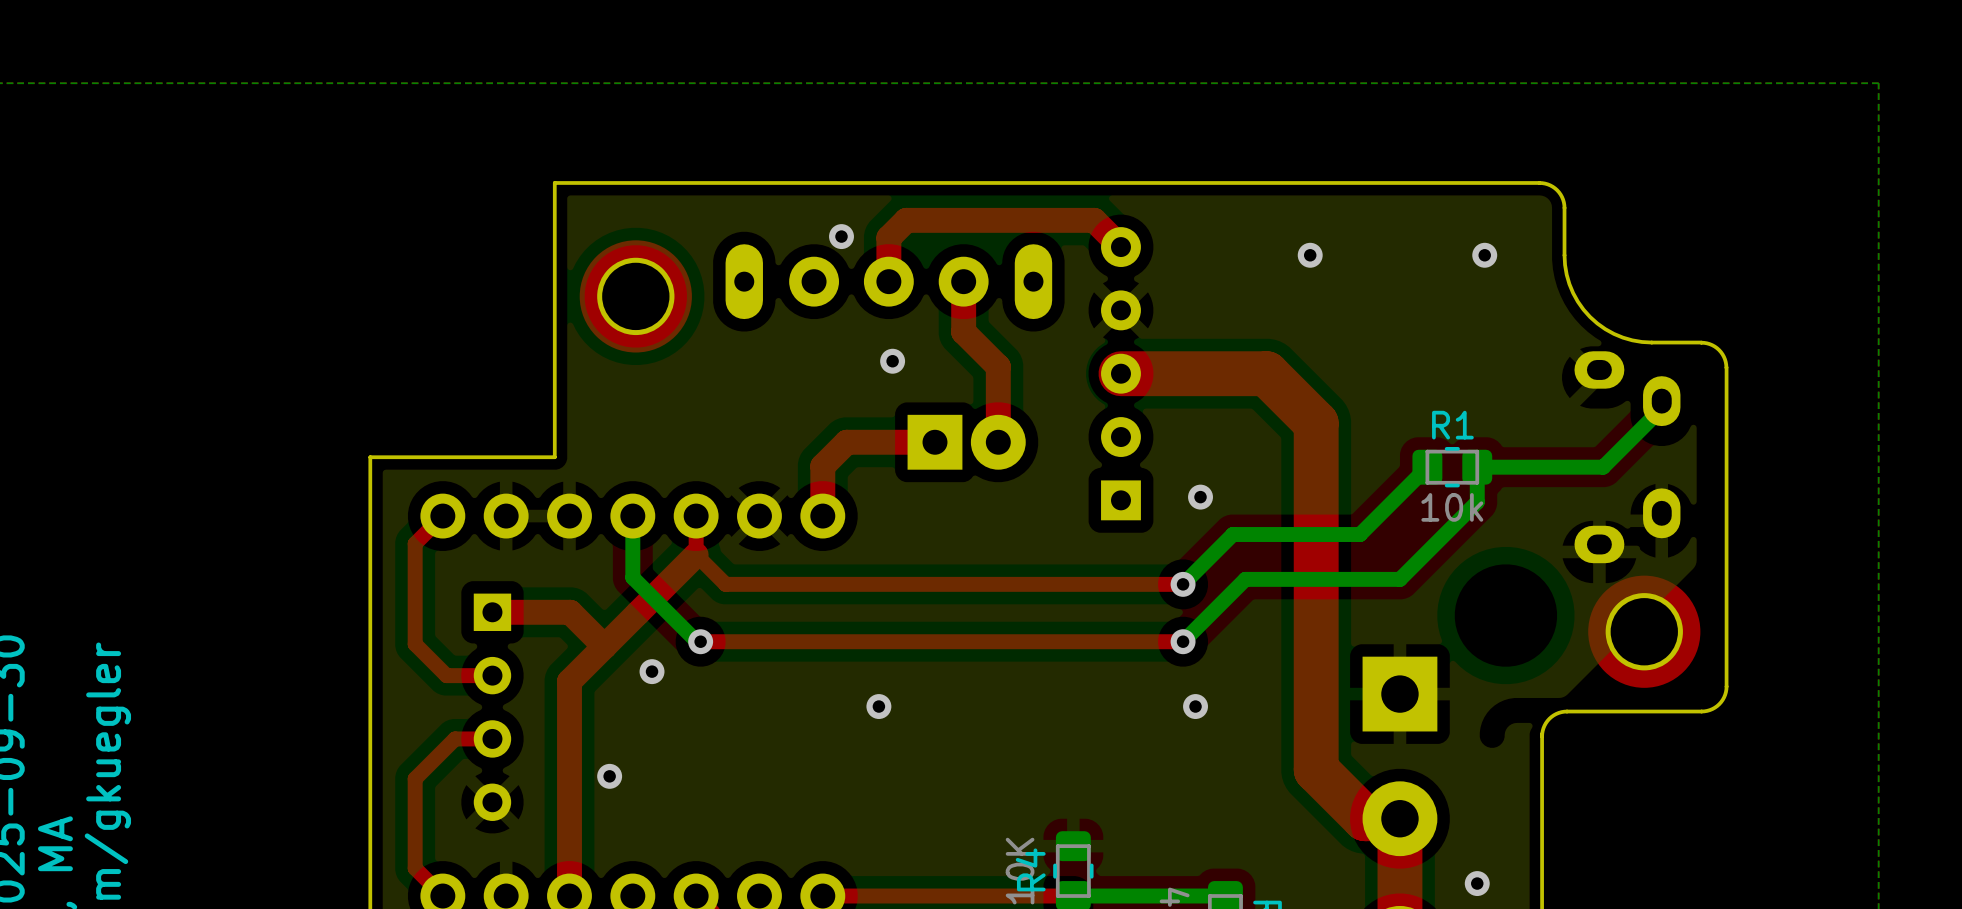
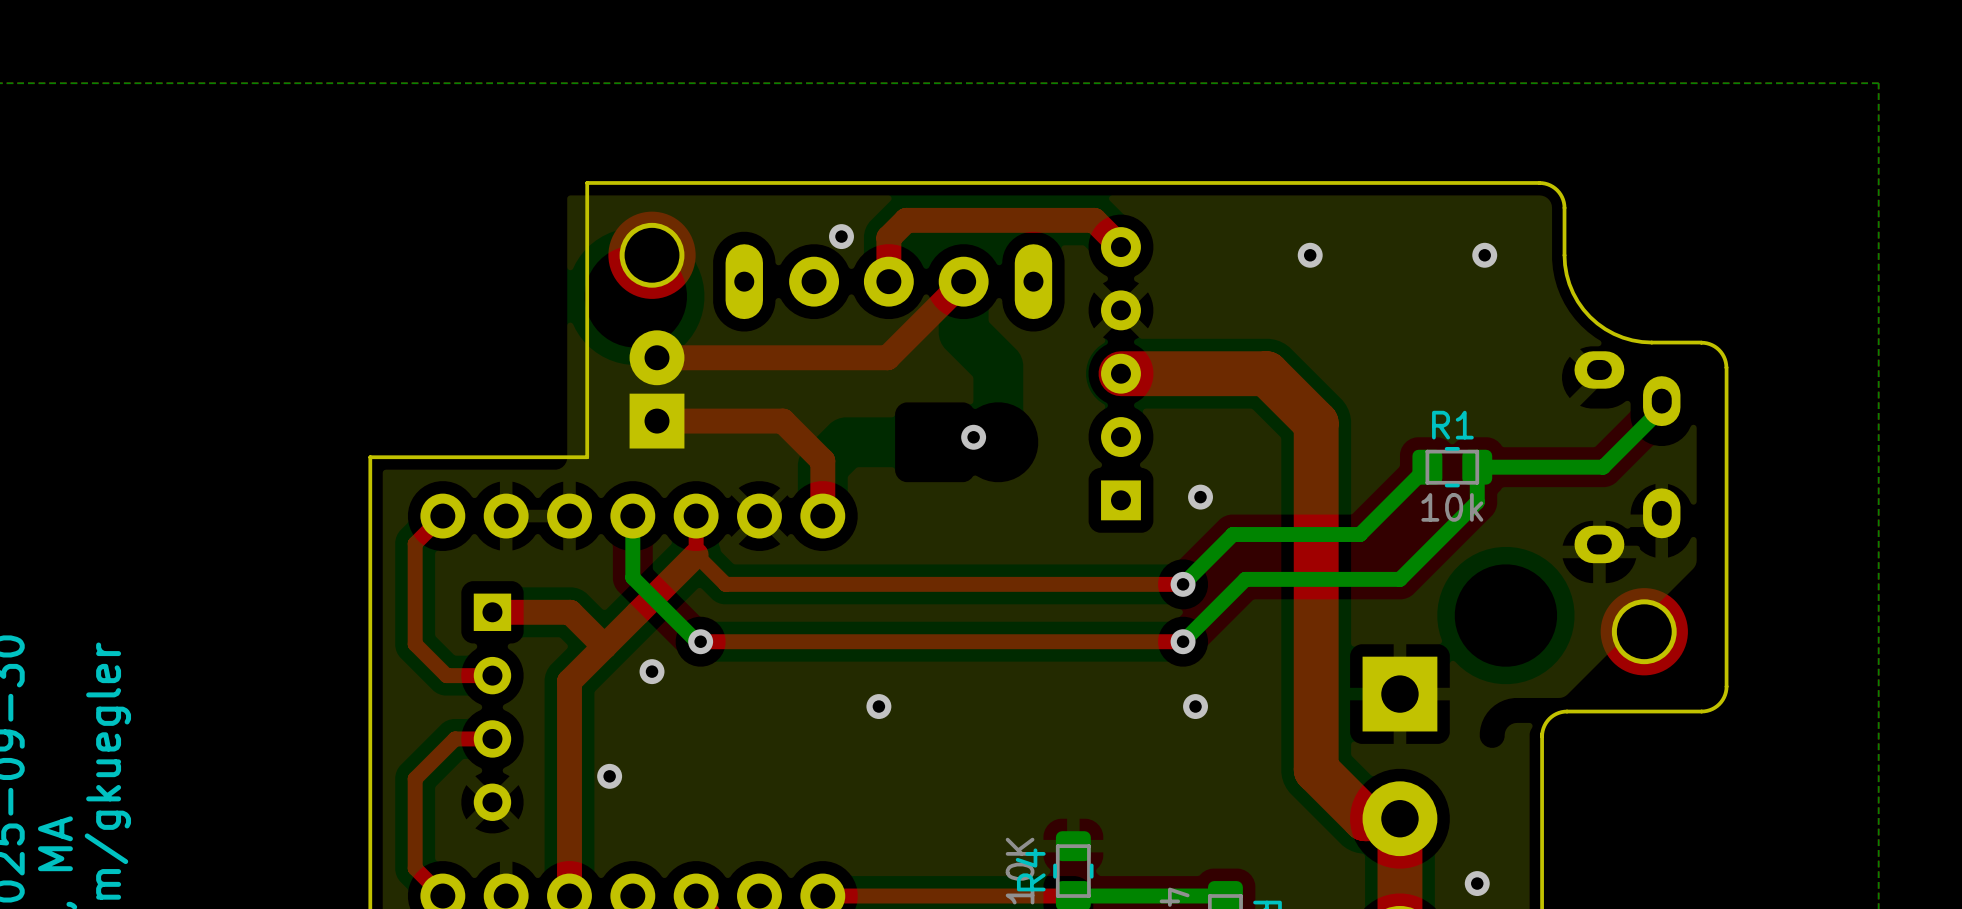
board edge: (587, 182) (554, 182) (554, 457) -> (587, 182) (587, 457) (554, 457)
part: none -> (652, 255)
top track: (963, 281) (963, 332) (998, 366) (998, 442) -> (963, 281) (887, 357) (657, 357)
part: (635, 296) -> none
via position: (892, 361) -> (973, 437)
top track: (934, 442) (846, 442) (822, 466) -> (657, 421) (782, 421) (822, 460) (822, 466)
part rotation: 0° (966, 442) -> 90° counterclockwise (657, 389)
part position: (966, 442) -> (657, 389)
part footprint: [1588, 575, 1701, 688] -> [1600, 588, 1688, 676]

